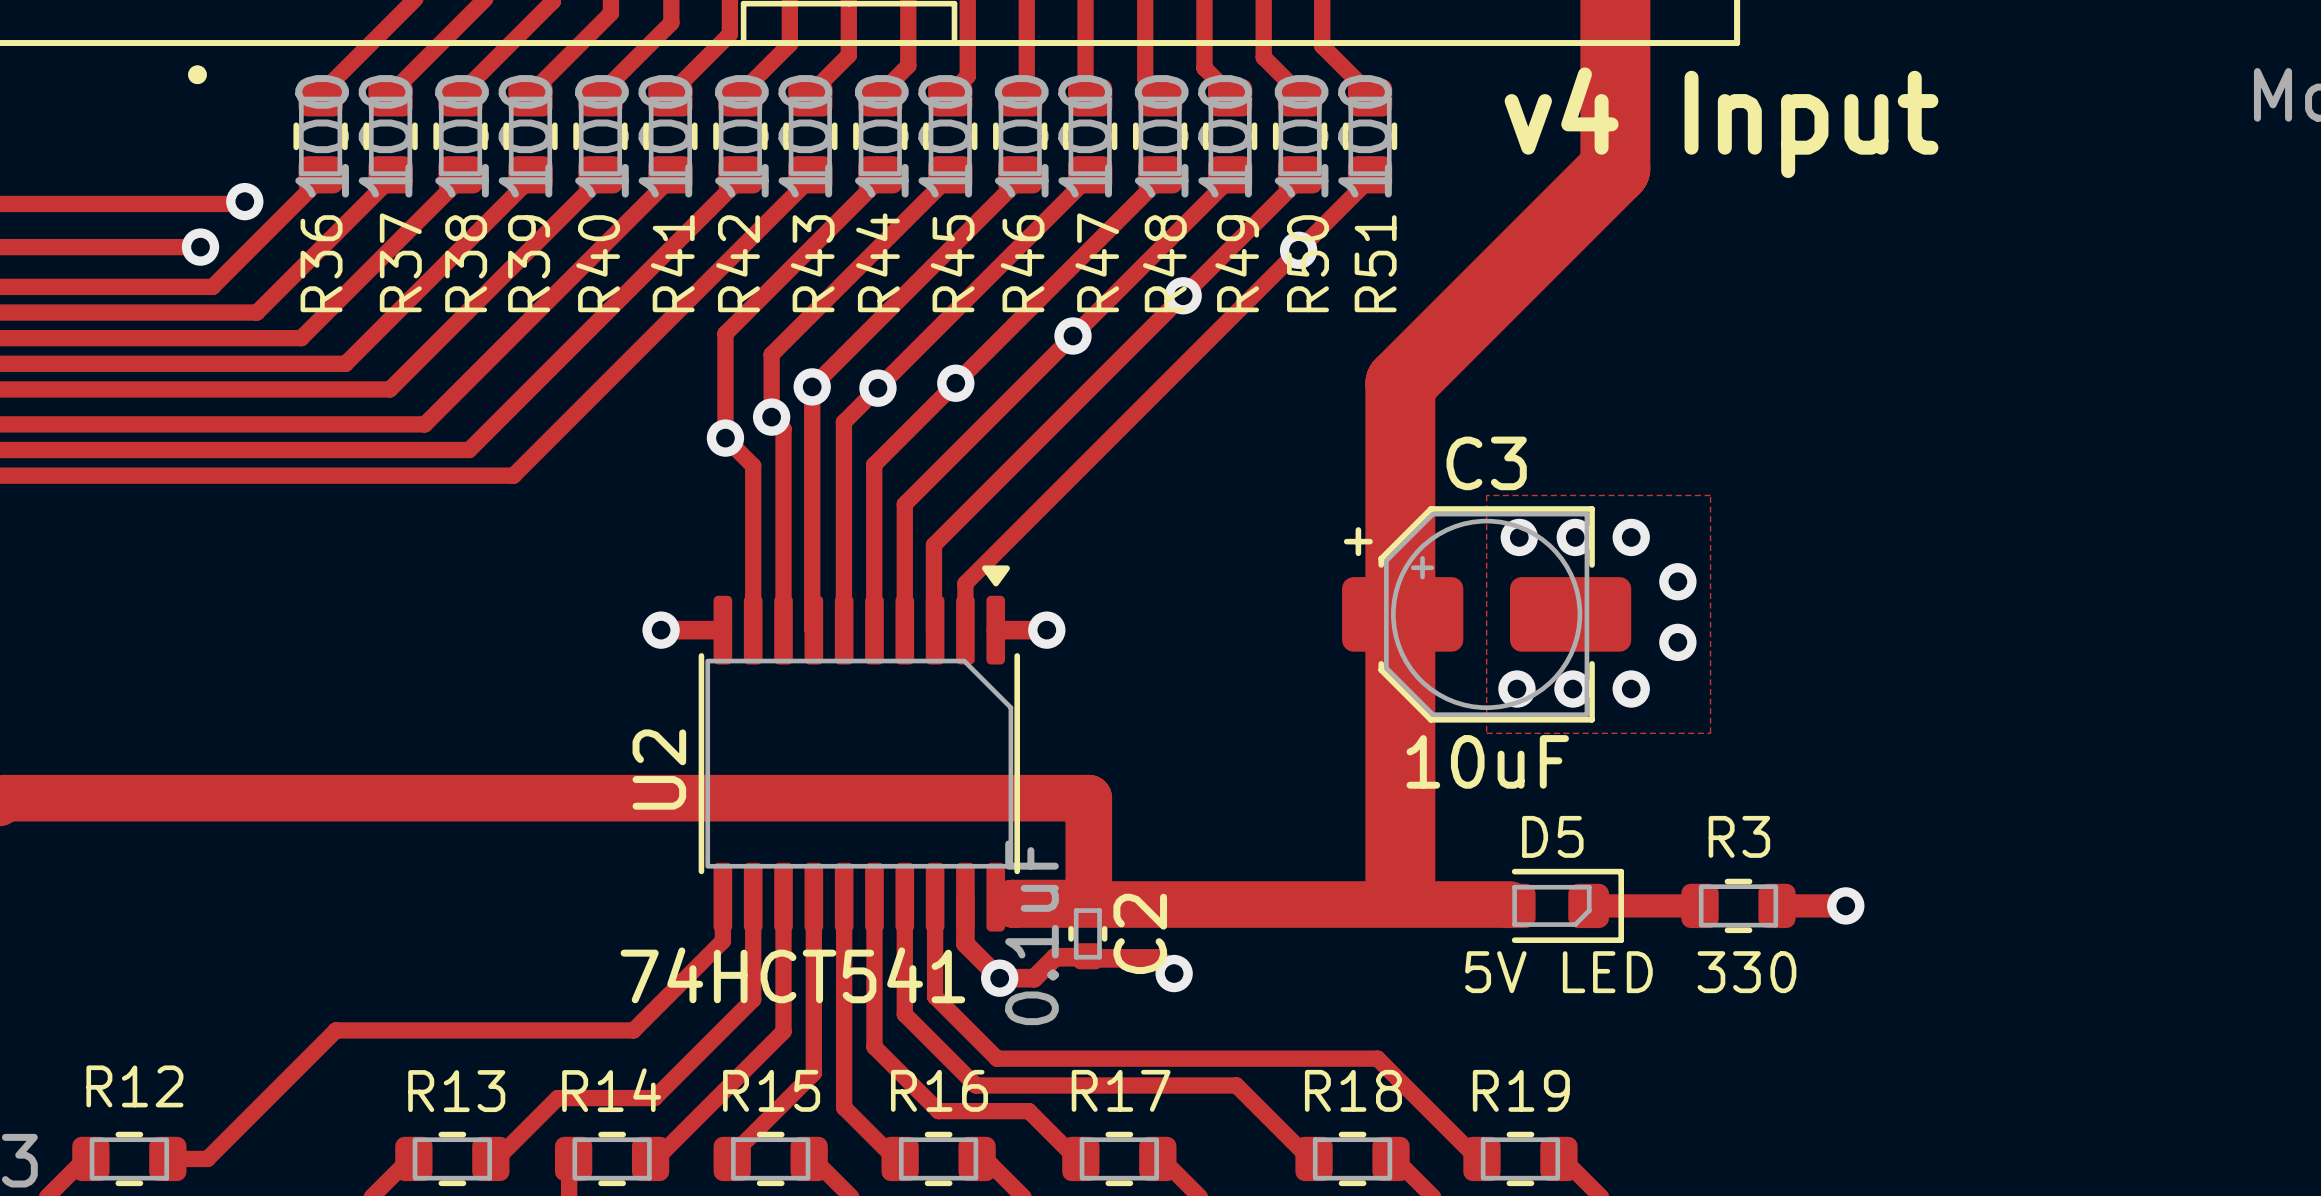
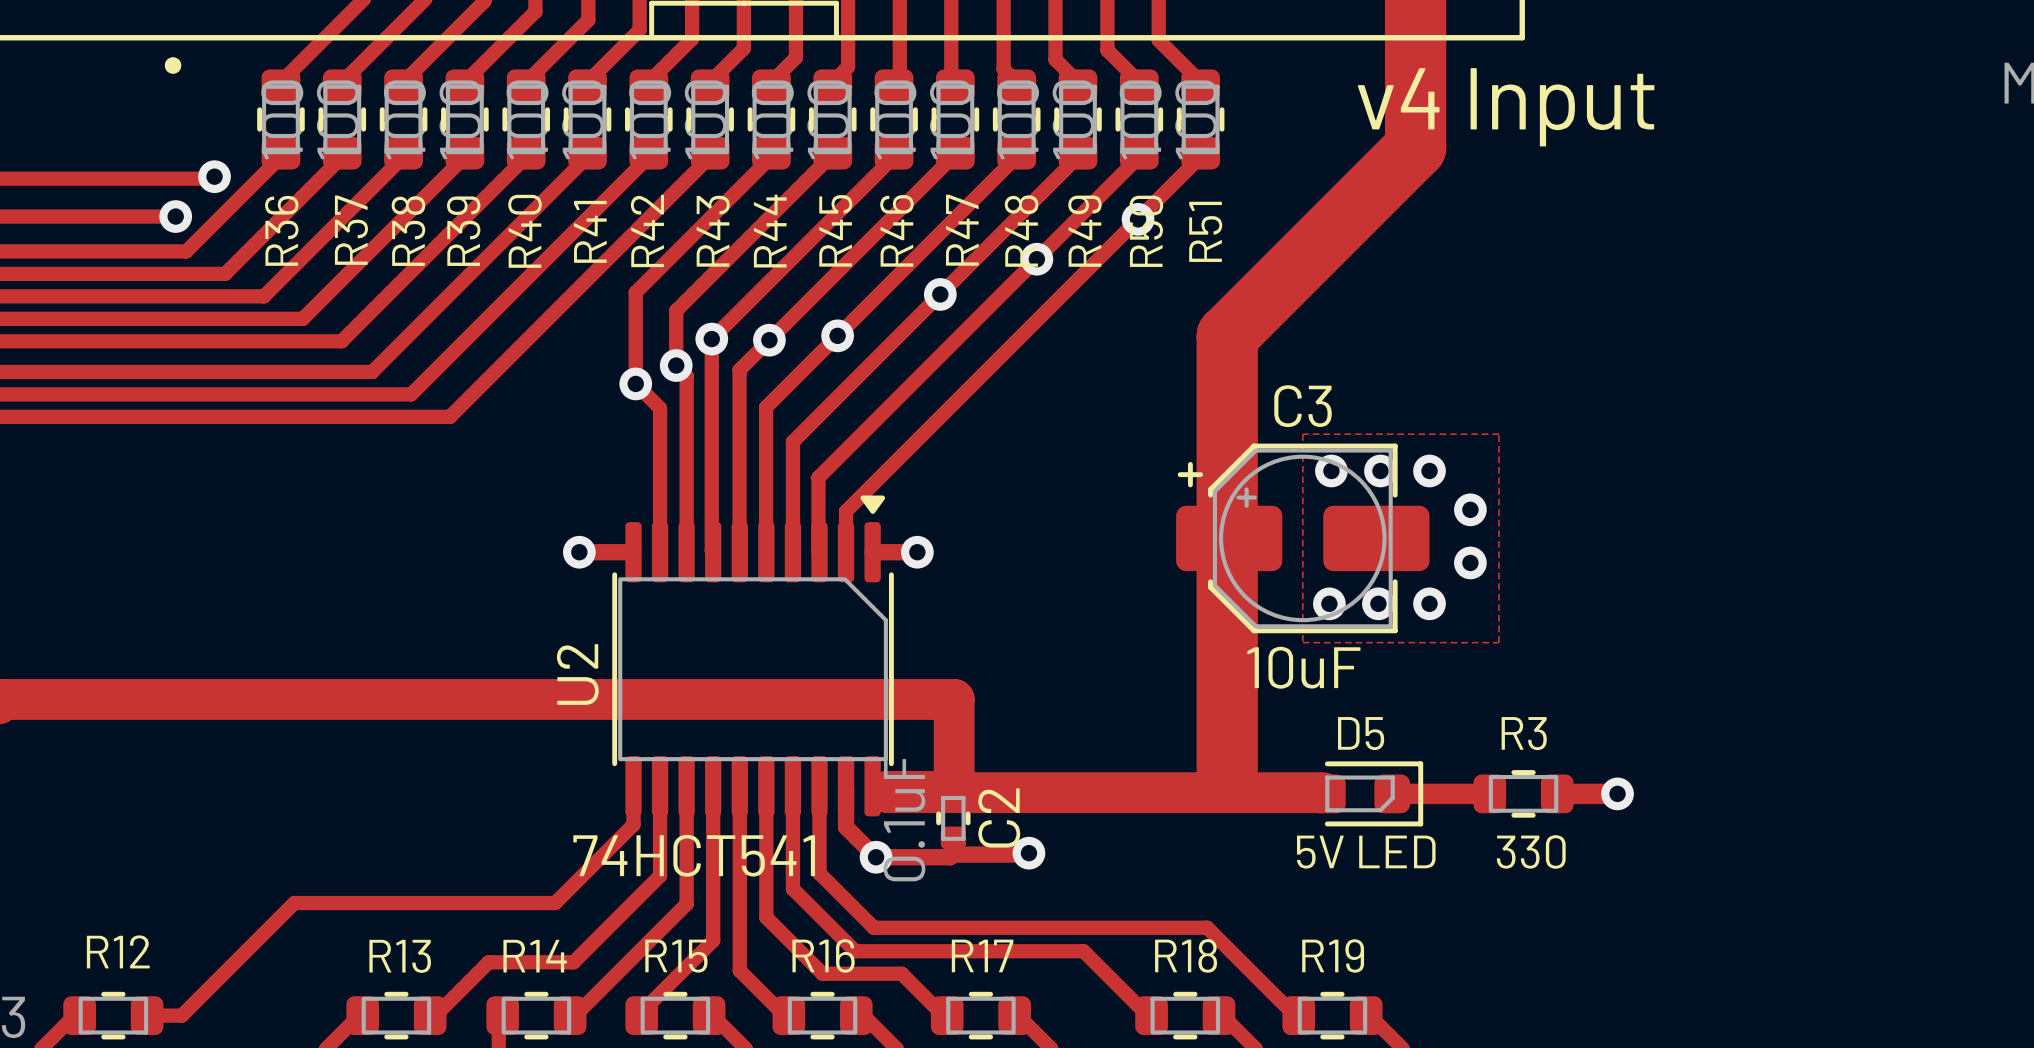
track: (1174, 973) (1158, 958) (1055, 957) (1034, 978) -> (1028, 853) (906, 857)

